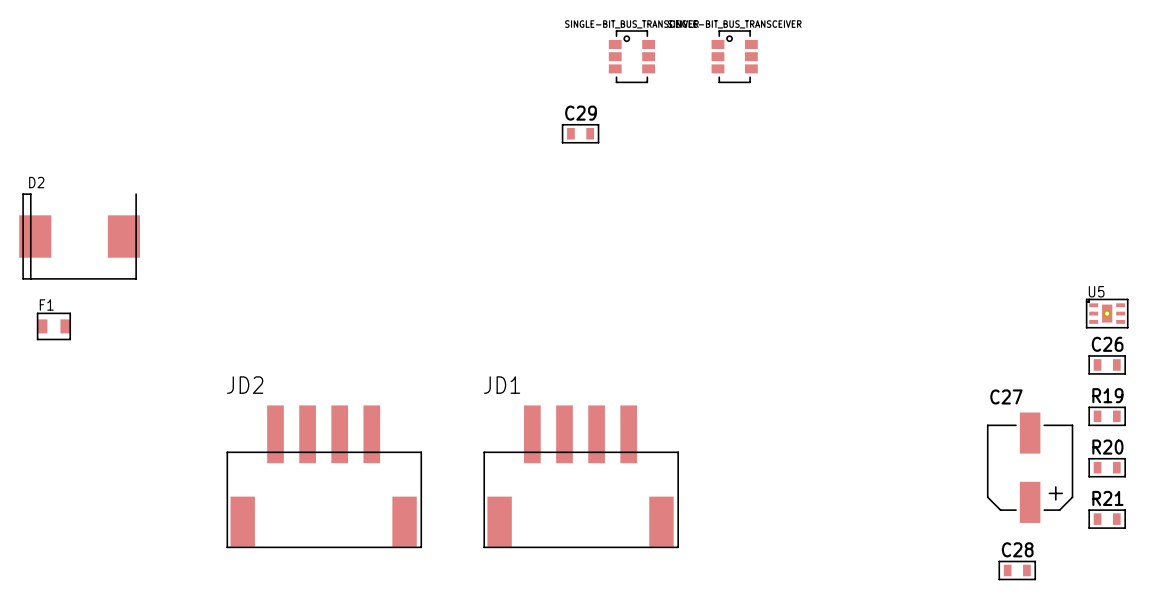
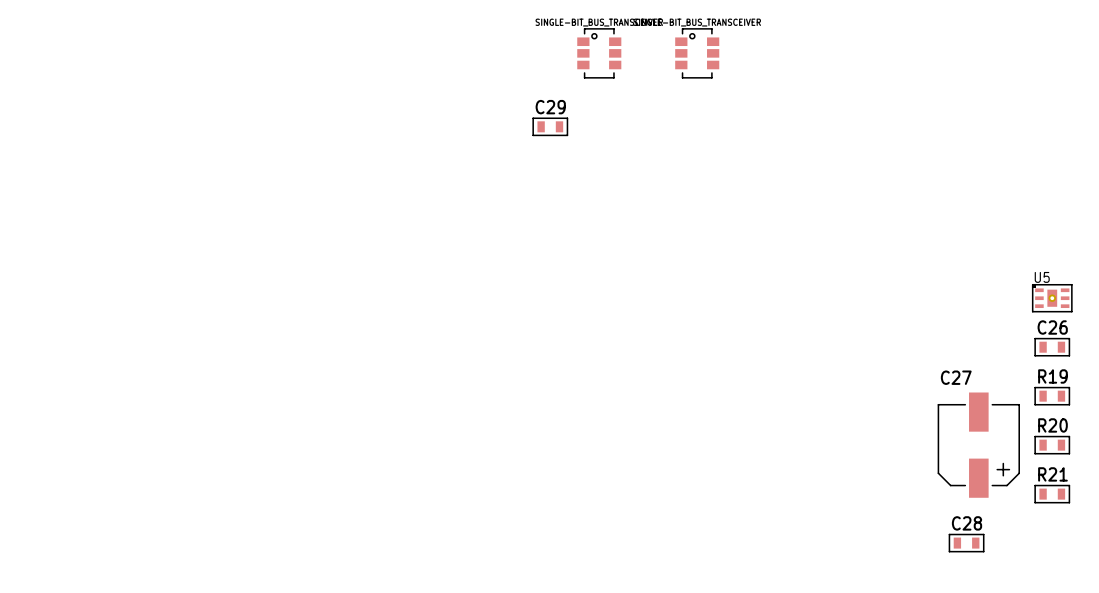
D2: (79, 236) -> none
F1: (53, 326) -> none
JD2: (324, 476) -> none
JD1: (581, 476) -> none

